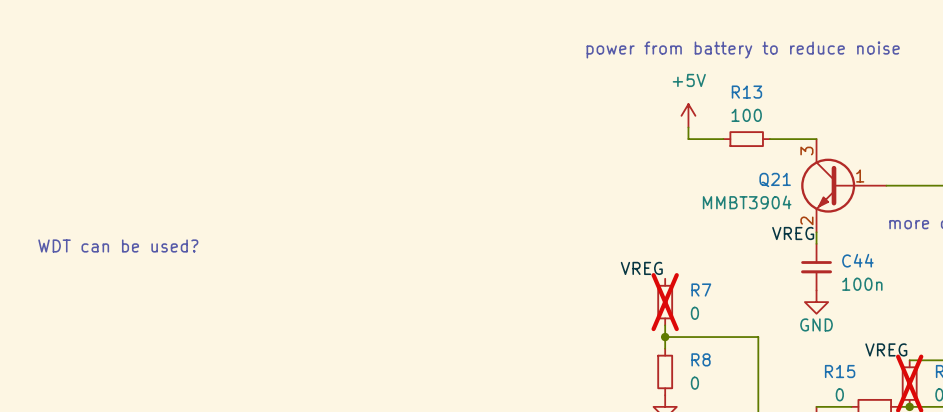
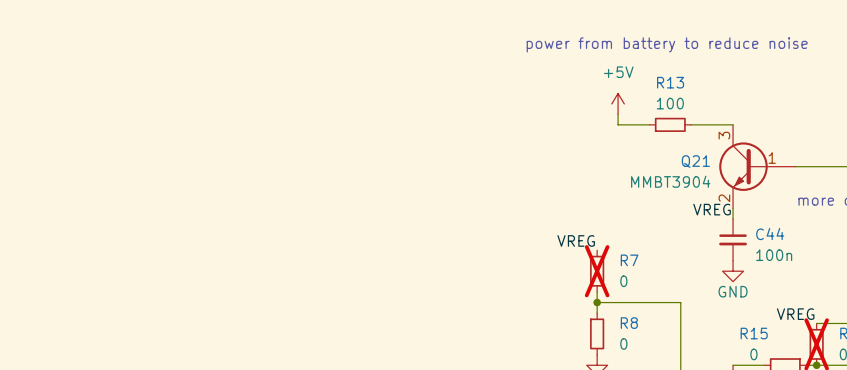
text: WDT can be used? (118, 245) -> none

